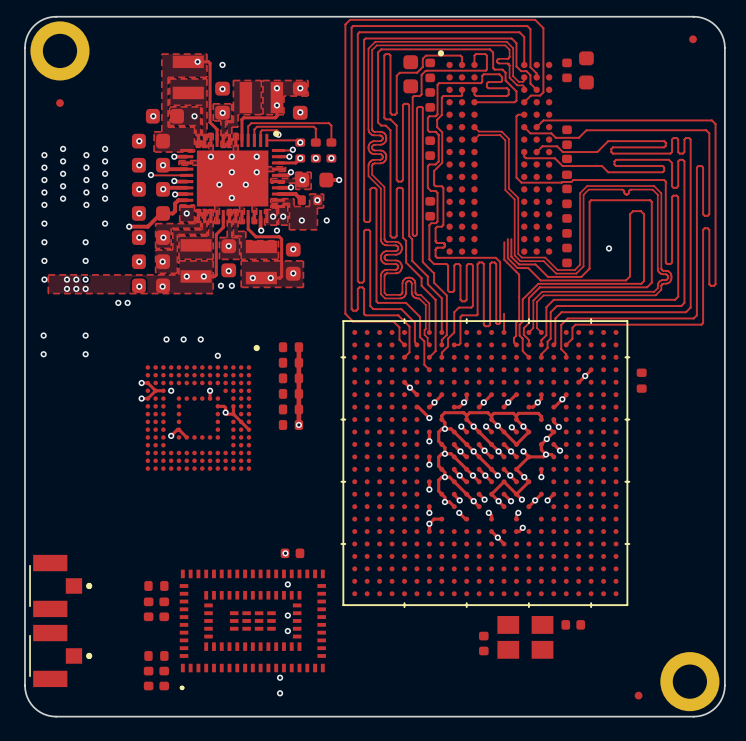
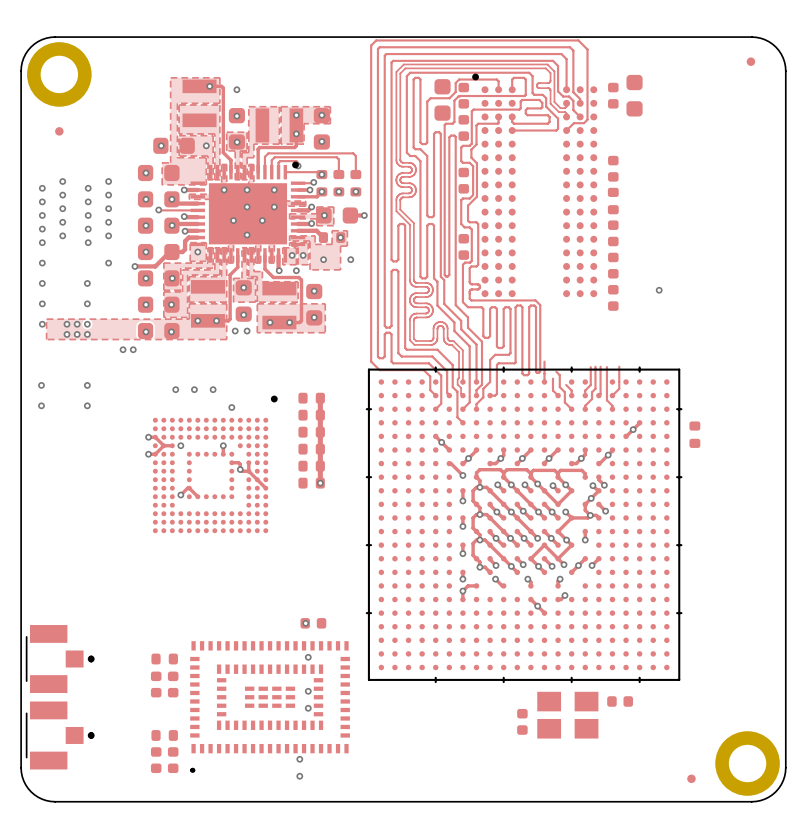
track: (524, 114) (516, 116) (516, 177) (521, 182) (561, 182) (573, 180) (664, 180) (665, 181) (665, 262) (667, 264) (672, 262) (672, 197) (673, 195) (678, 197) (678, 296) (675, 299) (553, 299) (546, 307) (546, 318) -> none
track: (474, 127) (478, 131) (501, 131) (508, 138) (508, 188) (518, 197) (518, 253) (521, 257) (545, 257) (557, 270) (574, 270) (580, 264) (580, 193) (587, 186) (654, 186) (661, 193) (661, 268) (670, 272) (670, 281) (662, 284) (661, 289) (655, 295) (543, 295) (536, 302) (536, 328) (541, 332) -> none
track: (524, 127) (530, 133) (551, 133) (555, 137) (578, 137) (586, 130) (706, 130) (709, 133) (709, 214) (707, 215) (703, 214) (703, 167) (701, 166) (696, 167) (696, 315) (693, 318) (567, 318) (561, 325) -> (606, 367) (606, 373)
track: (536, 127) (543, 120) (711, 120) (715, 124) (715, 284) (714, 285) (709, 284) (709, 229) (704, 228) (703, 229) (703, 323) (701, 324) (575, 324) (572, 327) -> (619, 366) (619, 376)
track: (474, 139) (478, 135) (500, 135) (505, 140) (505, 190) (514, 199) (514, 255) (520, 261) (543, 261) (556, 273) (576, 273) (583, 266) (583, 194) (588, 189) (622, 189) (626, 194) (630, 189) (652, 189) (657, 194) (657, 269) (660, 273) (667, 274) (667, 279) (659, 281) (654, 291) (542, 291) (533, 300) (533, 328) (528, 332) -> none
track: (524, 152) (525, 158) (554, 158) (562, 166) (602, 166) (608, 172) (662, 172) (664, 170) (662, 166) (616, 166) (614, 161) (616, 159) (668, 159) (672, 162) (673, 187) (678, 186) (678, 161) (679, 159) (684, 161) (684, 302) (681, 306) (556, 306) (550, 312) (550, 318) -> none
track: (536, 152) (542, 146) (557, 146) (562, 152) (597, 152) (608, 141) (664, 141) (665, 142) (664, 147) (612, 147) (611, 152) (612, 153) (670, 153) (672, 139) (676, 138) (678, 152) (682, 153) (684, 139) (686, 138) (690, 139) (690, 307) (686, 312) (561, 312) (555, 318) -> none
track: (507, 239) (507, 258) (517, 268) (528, 268) (540, 280) (626, 280) (630, 276) (630, 214) (633, 211) (640, 211) (644, 214) (644, 281) (641, 283) (538, 283) (522, 299) (522, 321) (519, 324) (519, 335) (522, 341) -> (556, 371) (559, 375) (559, 387) (564, 392)
track: (511, 239) (511, 256) (519, 264) (535, 264) (548, 276) (581, 276) (589, 268) (589, 201) (591, 200) (650, 200) (651, 201) (651, 282) (647, 287) (539, 287) (528, 298) (528, 323) (523, 328) (523, 334) (528, 340) -> (566, 385) (571, 390)
track: (504, 242) (504, 259) (519, 274) (519, 320) (516, 323) (513, 342) -> (552, 378) (552, 390) (555, 392)

